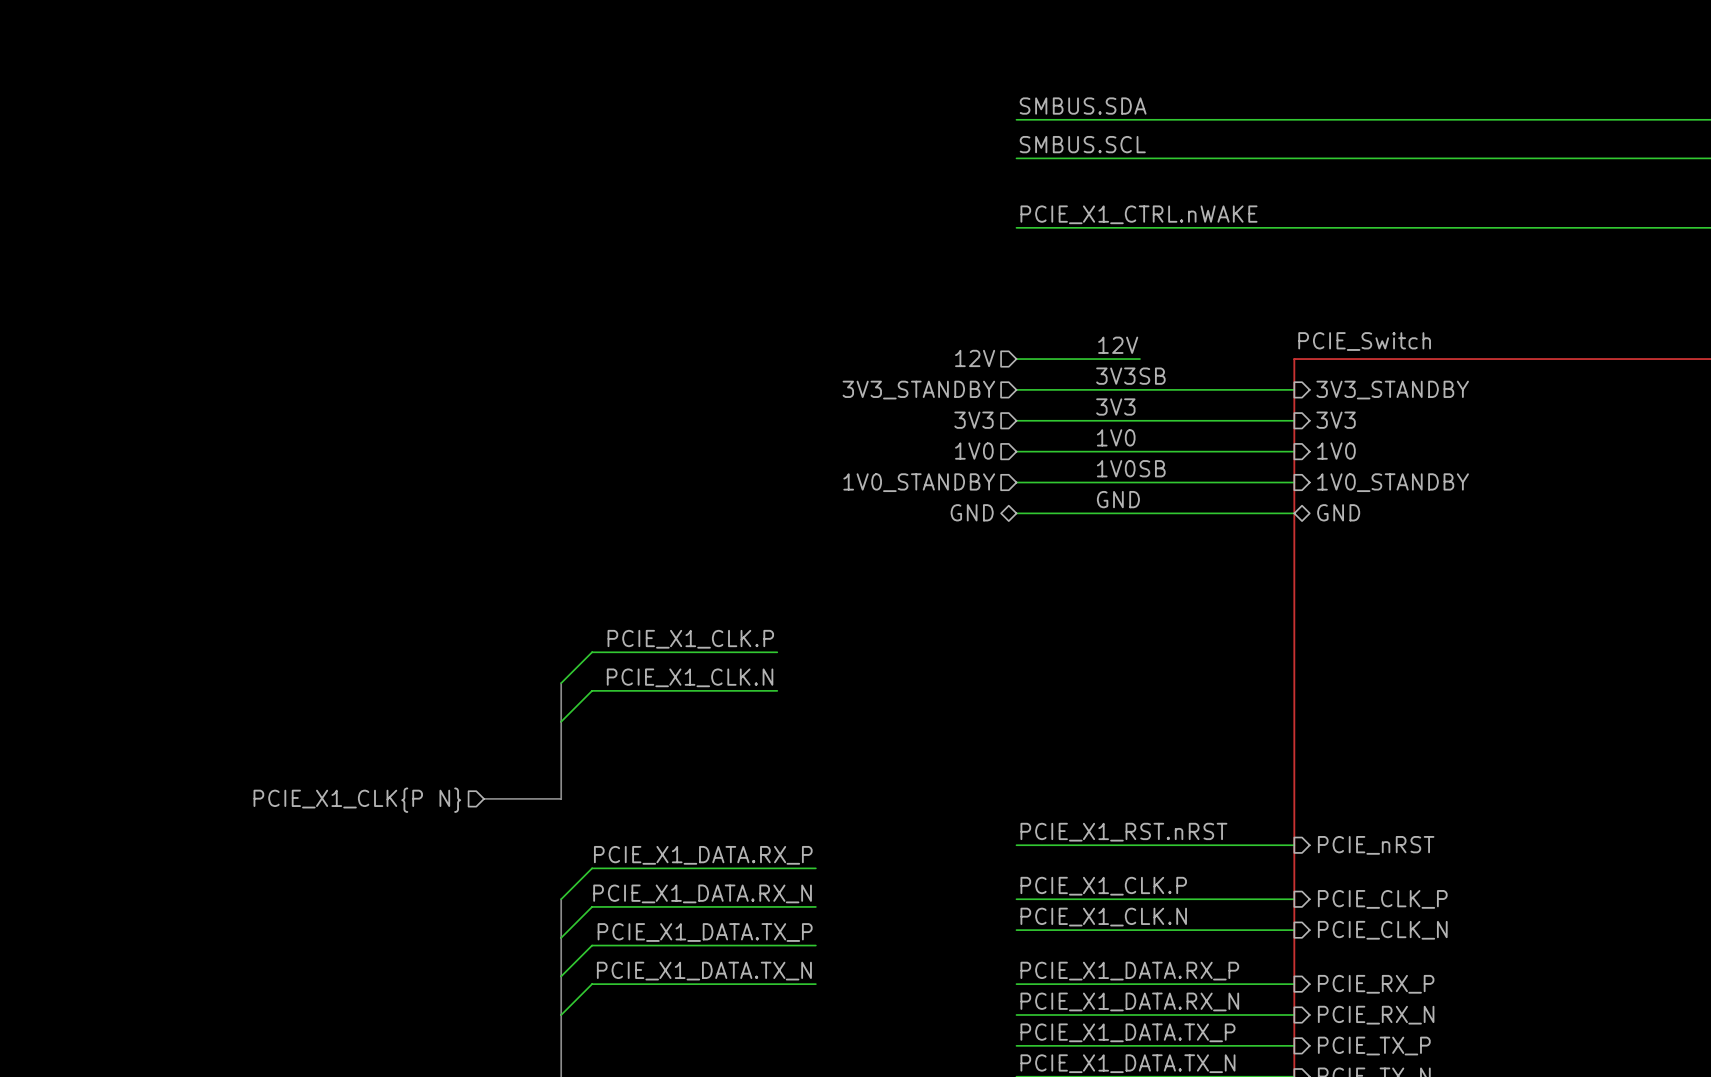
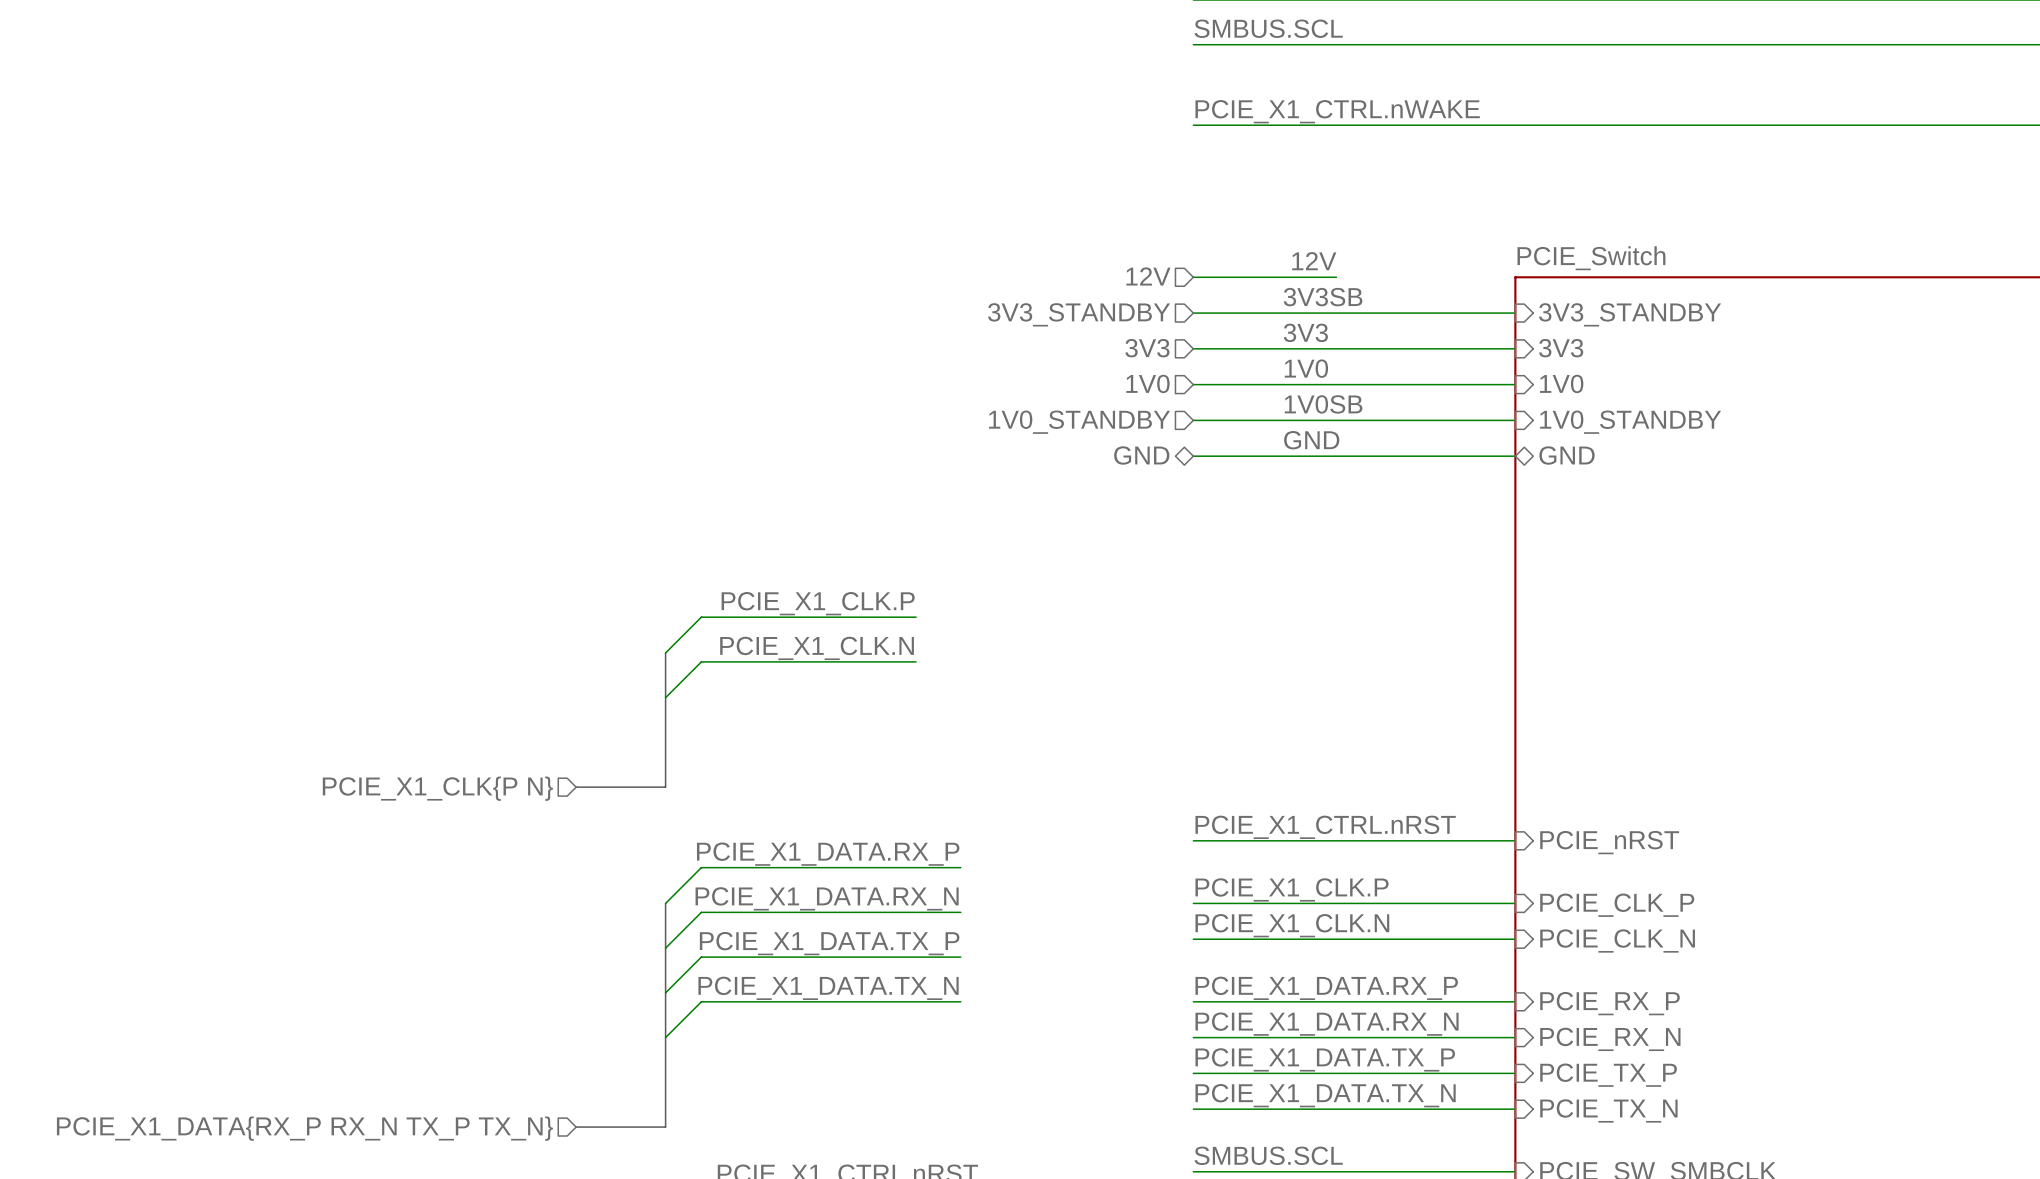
label: PCIE_X1_RST.nRST (1123, 832) -> PCIE_X1_CTRL.nRST (1325, 827)

